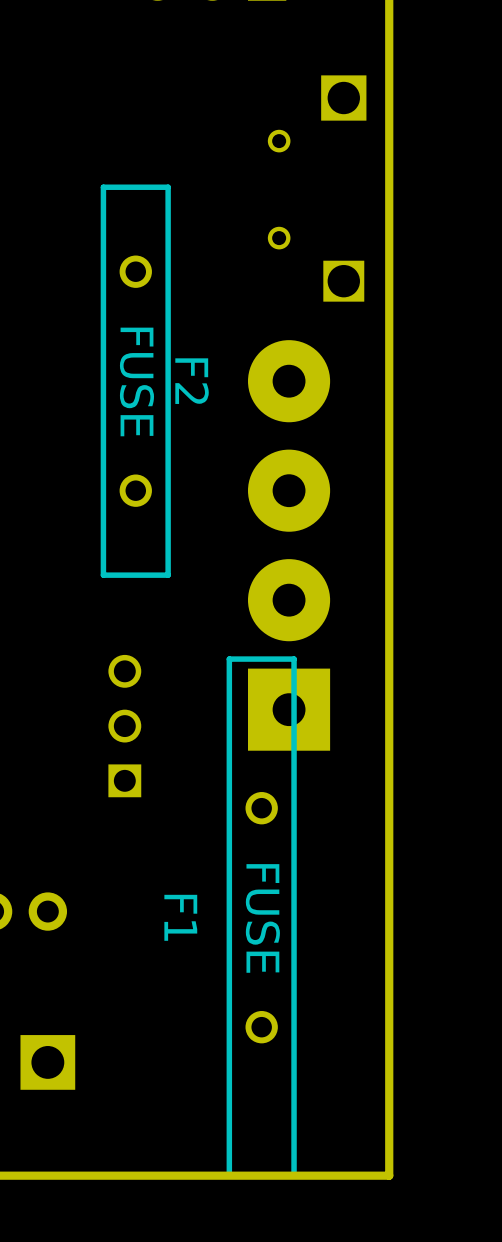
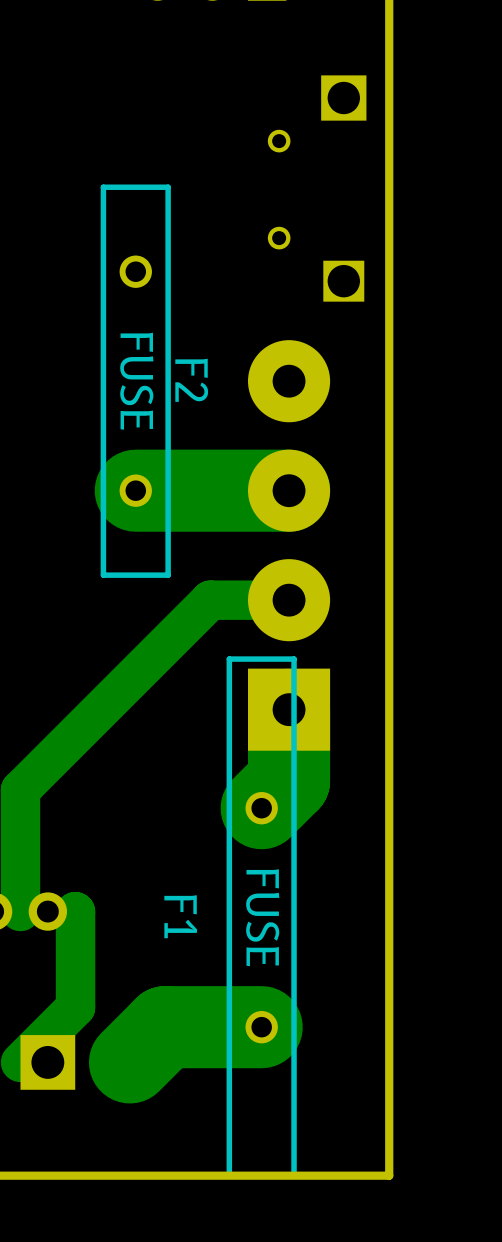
track: none -> (289, 490) (135, 490)
track: none -> (289, 600) (210, 600) (20, 790) (20, 911)
track: none -> (289, 709) (289, 780) (261, 808)
part: (124, 726) -> none
track: none -> (75, 911) (75, 1007) (20, 1062)
track: none -> (261, 1027) (165, 1027) (129, 1062)

